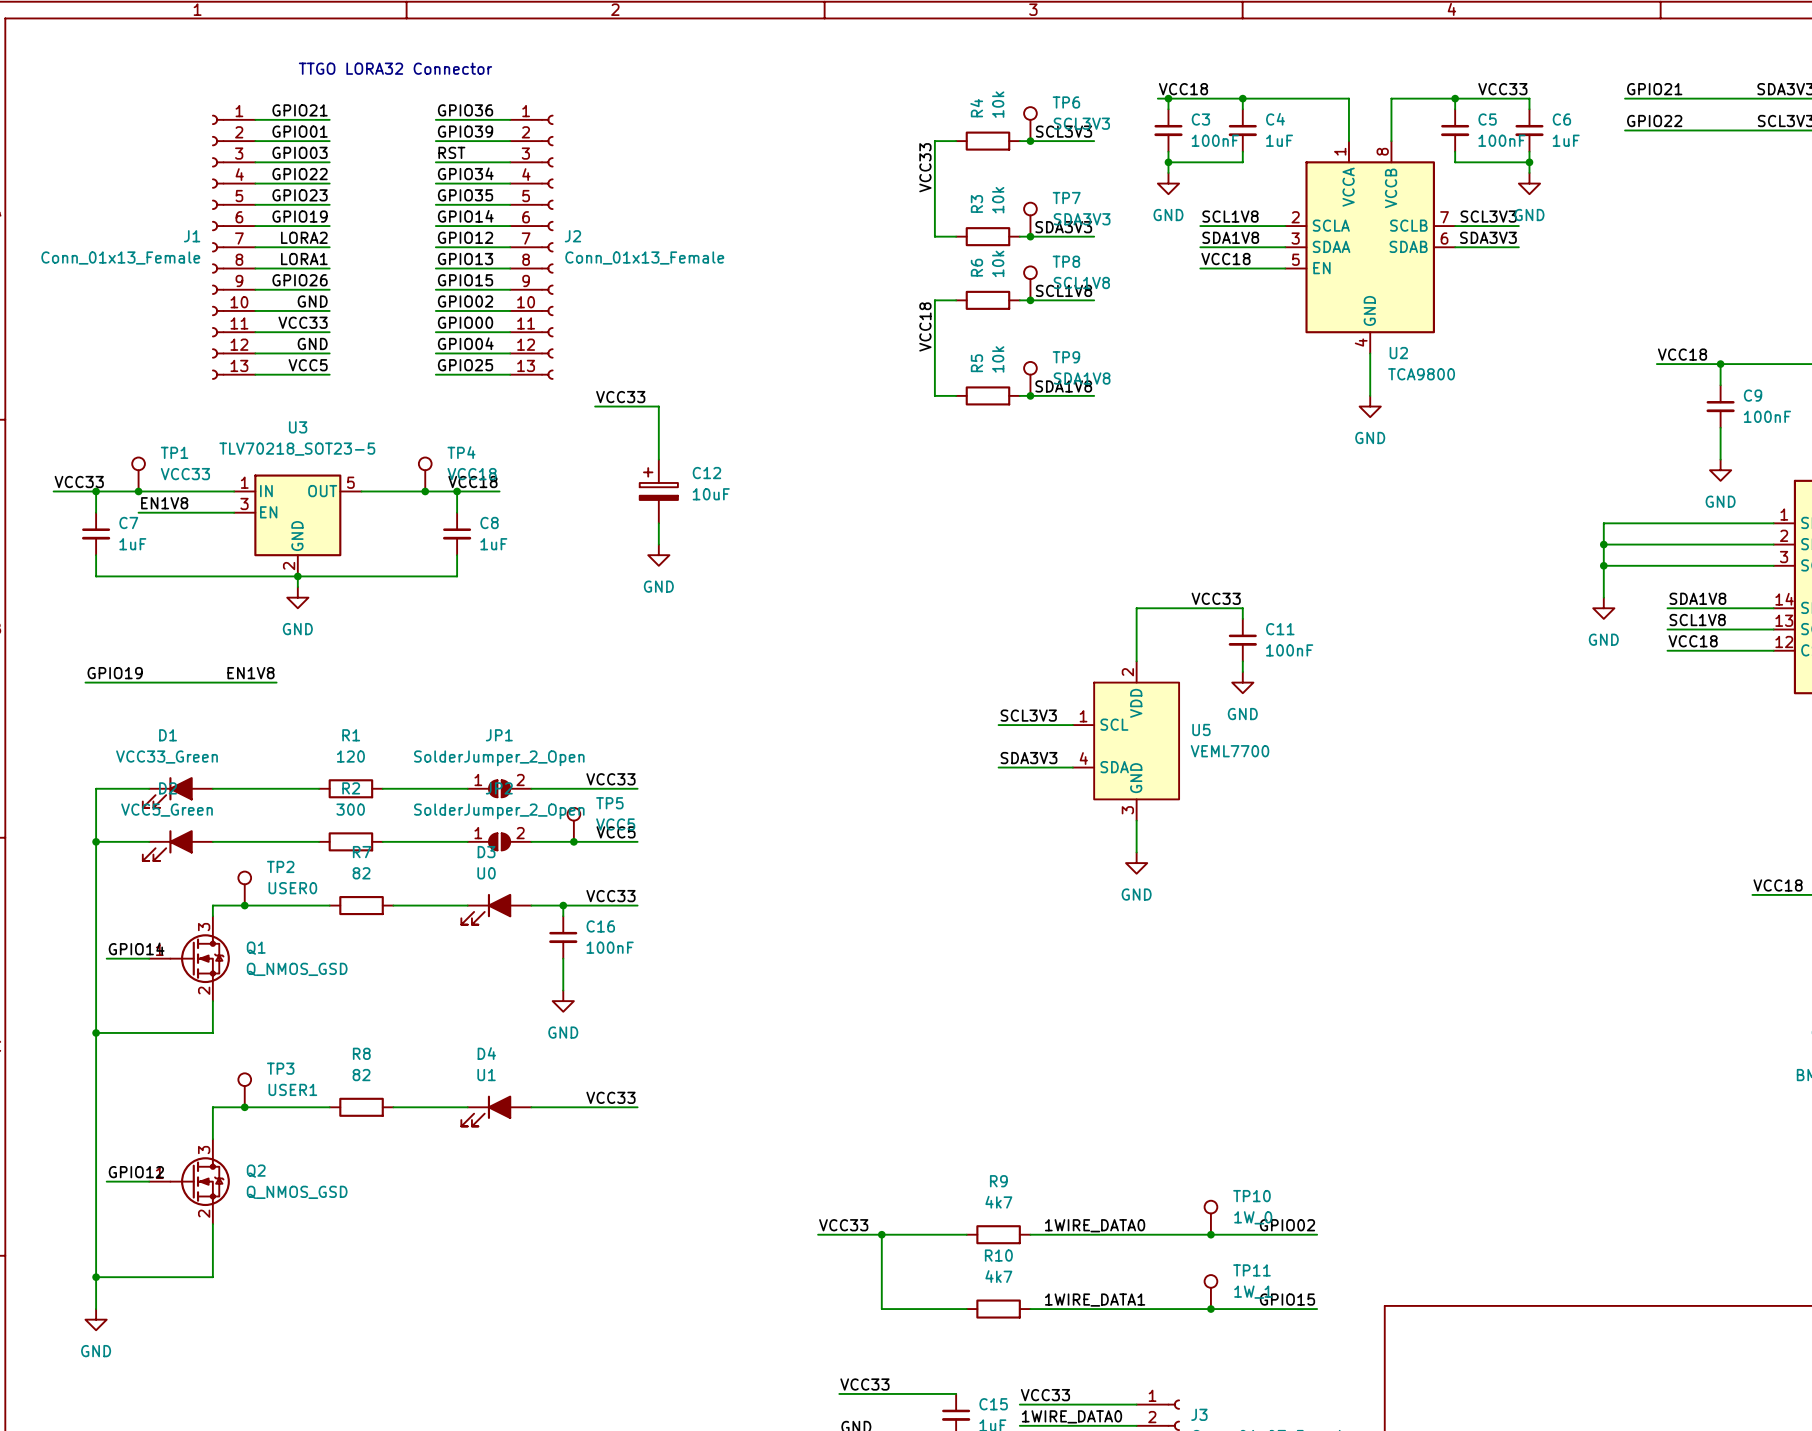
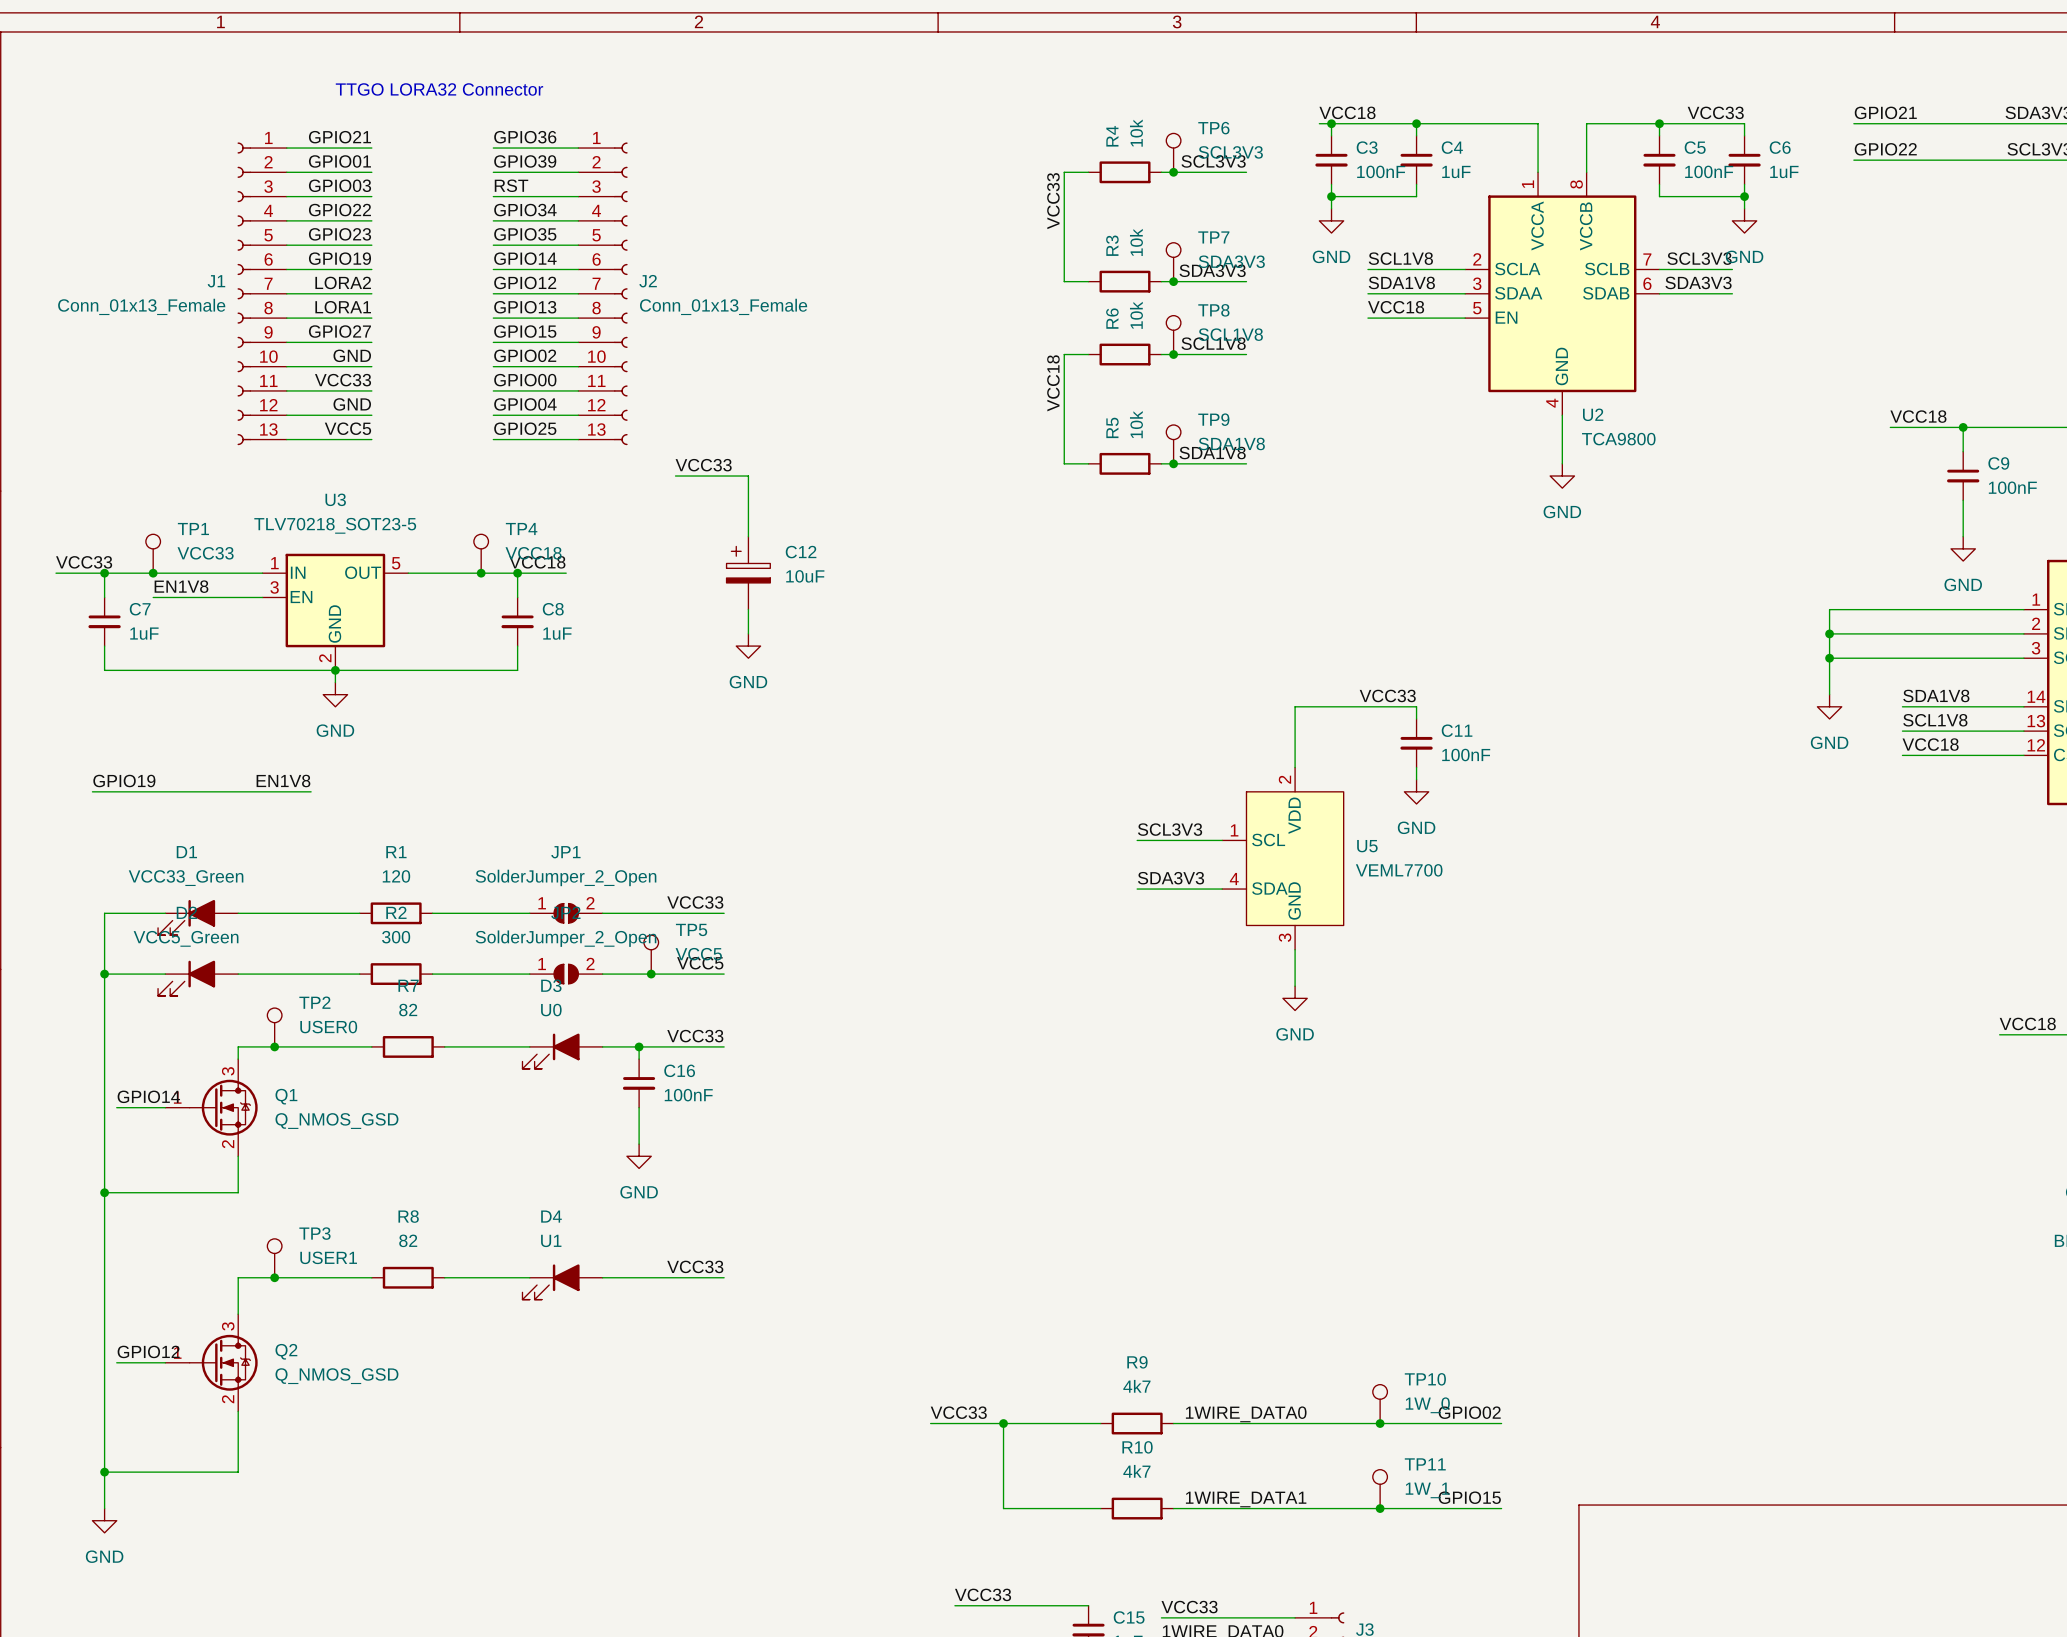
label: GPIO26 (300, 280) -> GPIO27 (339, 331)

